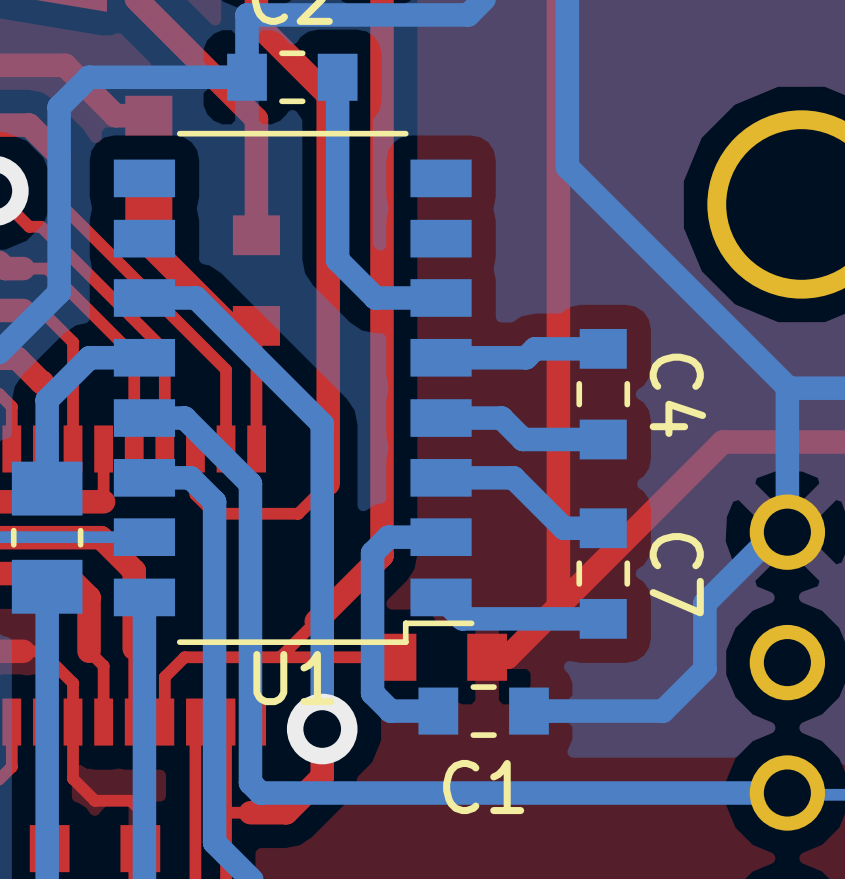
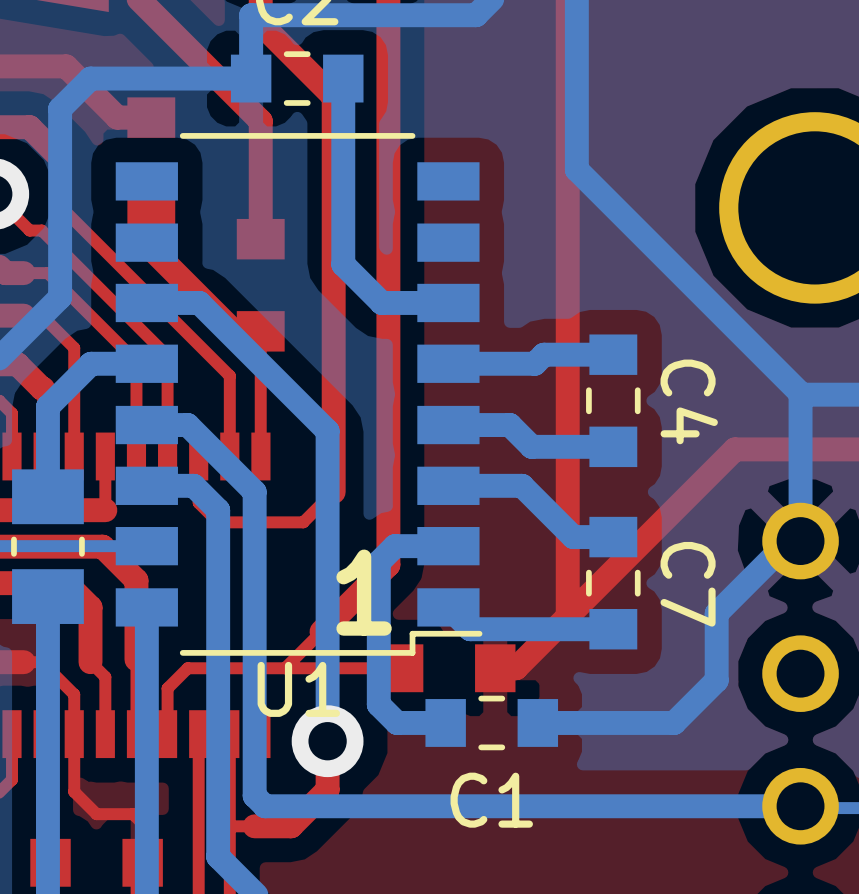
text: none -> 1 (364, 592)

